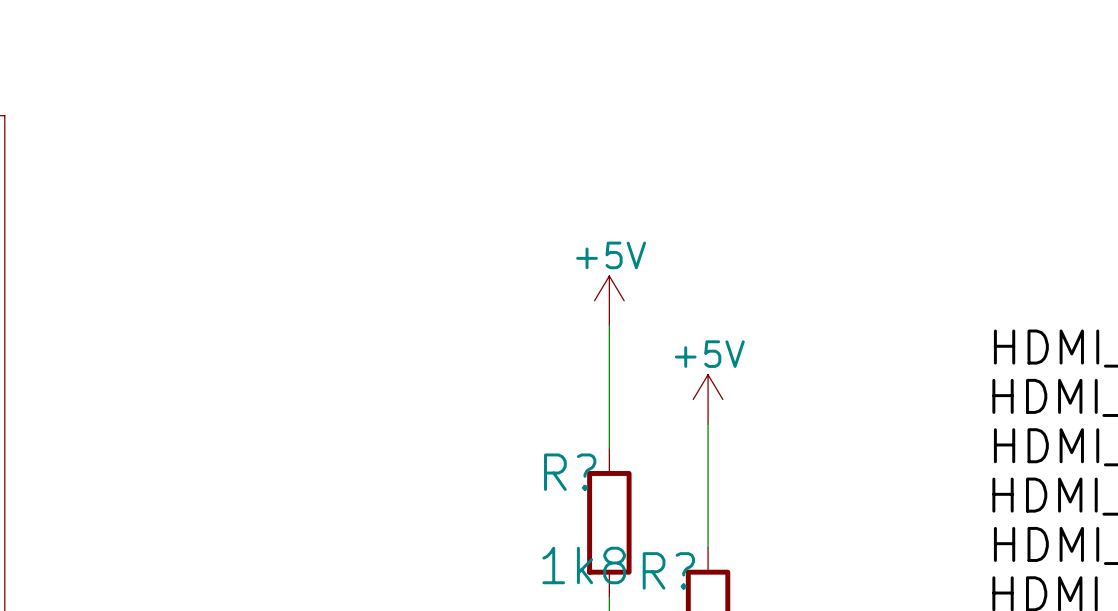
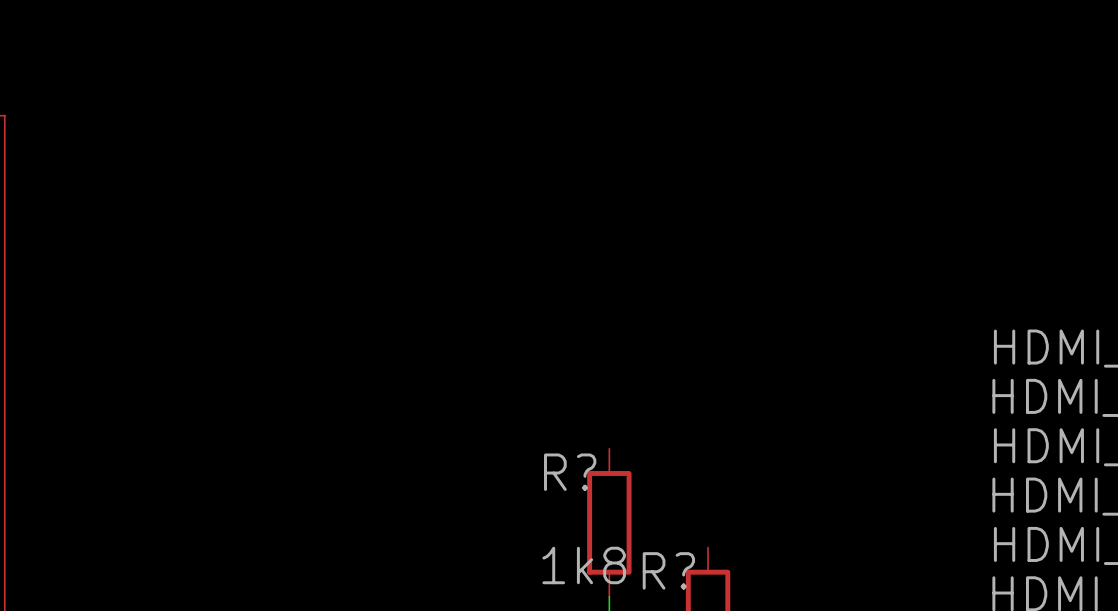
power symbol: +5V (609, 300) -> none
wire: (609, 325) (609, 448) -> none
power symbol: +5V (708, 399) -> none
wire: (708, 424) (708, 547) -> none

